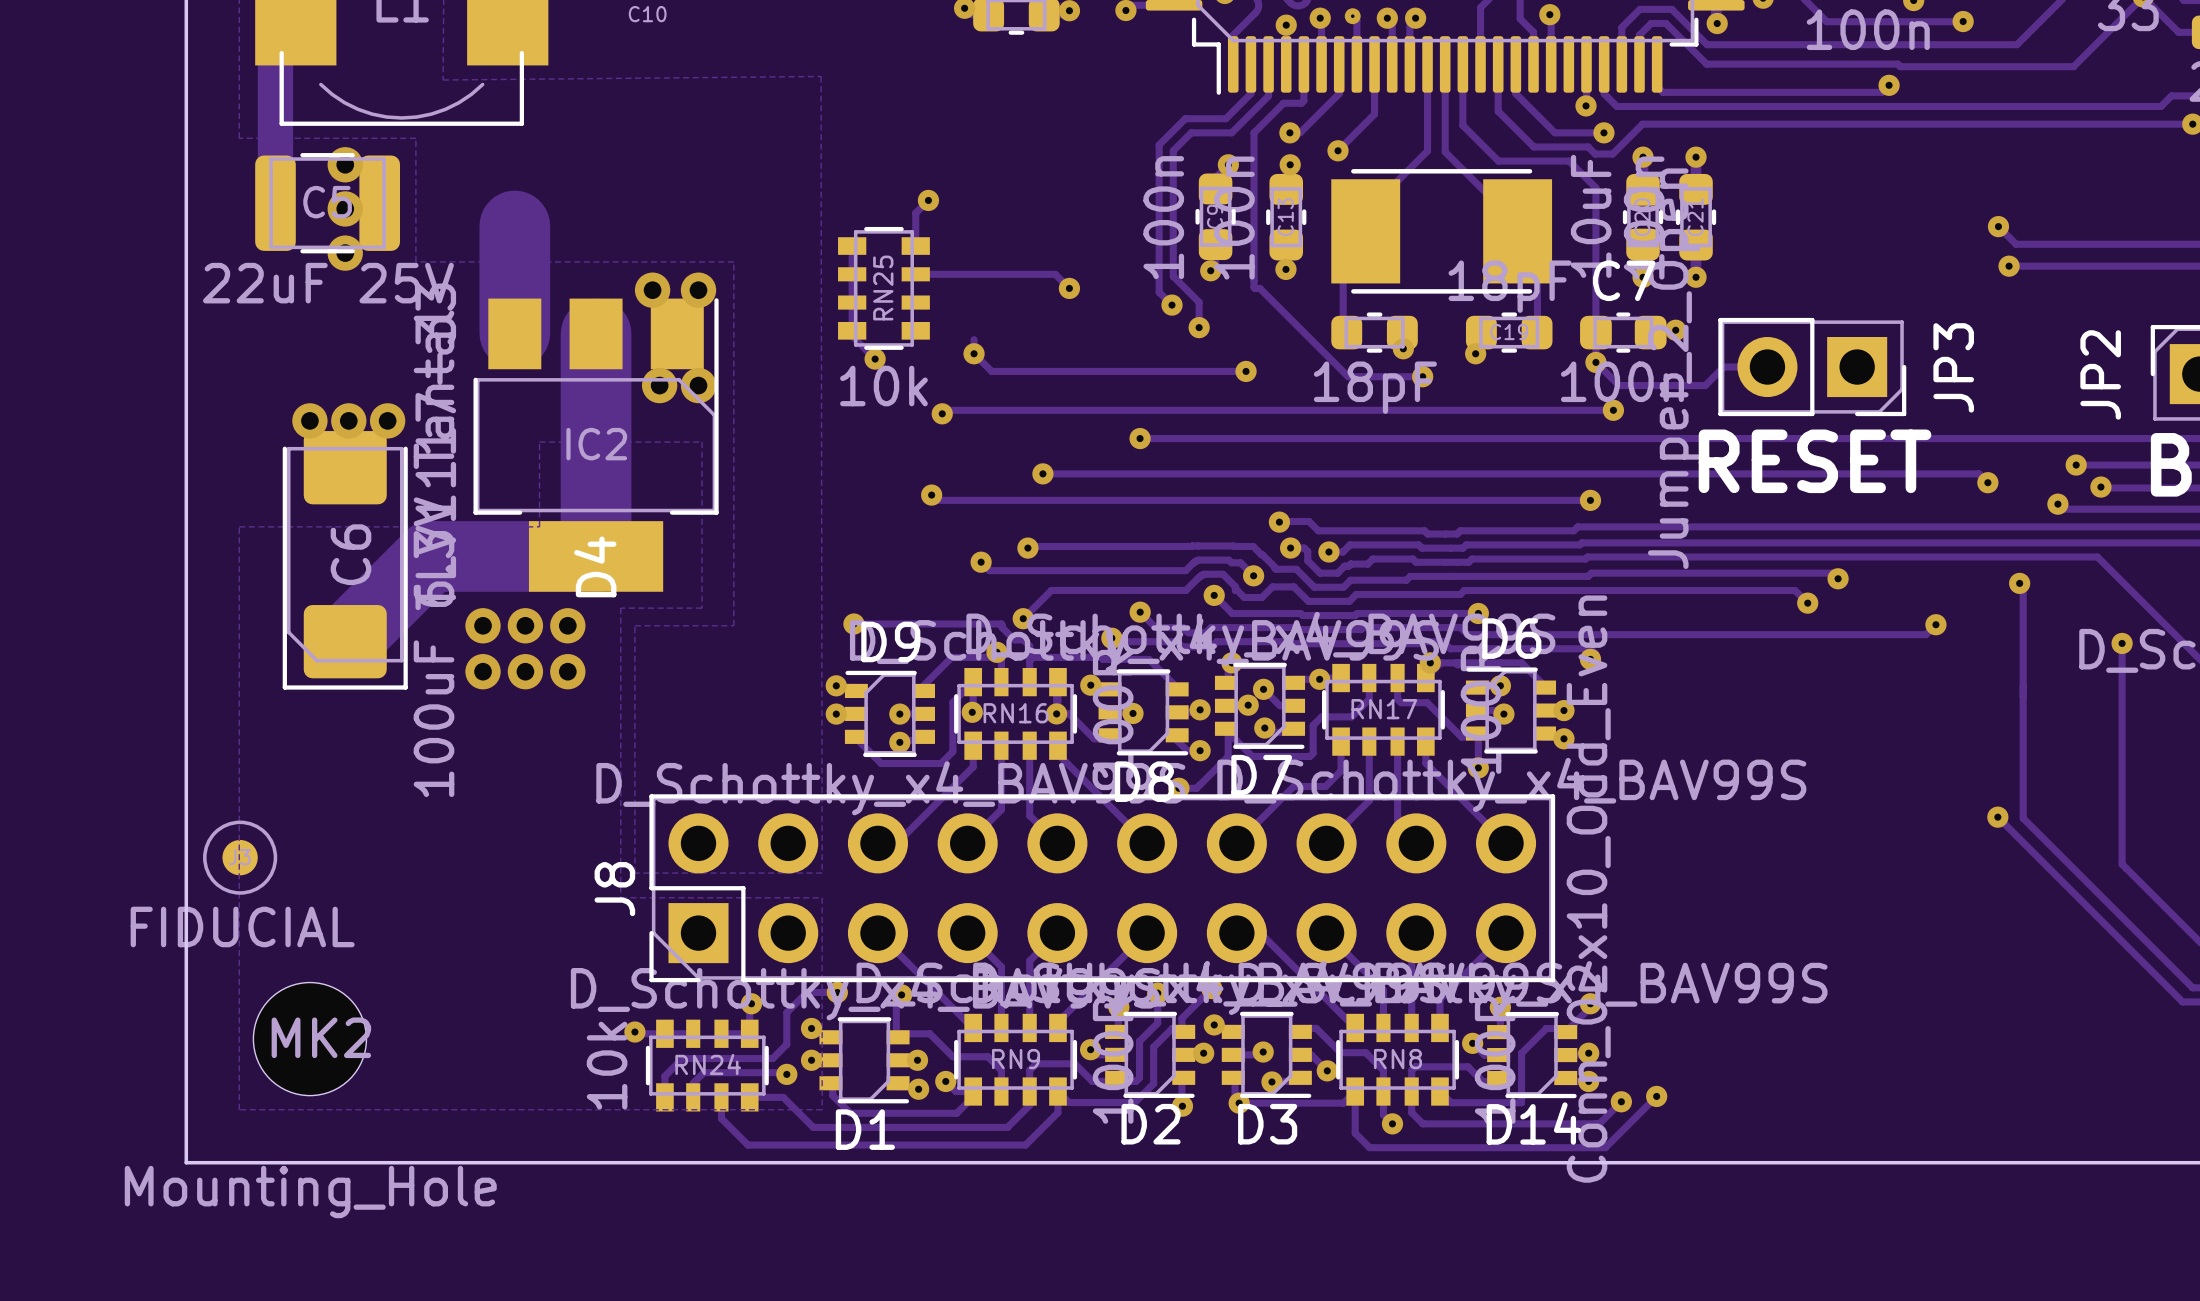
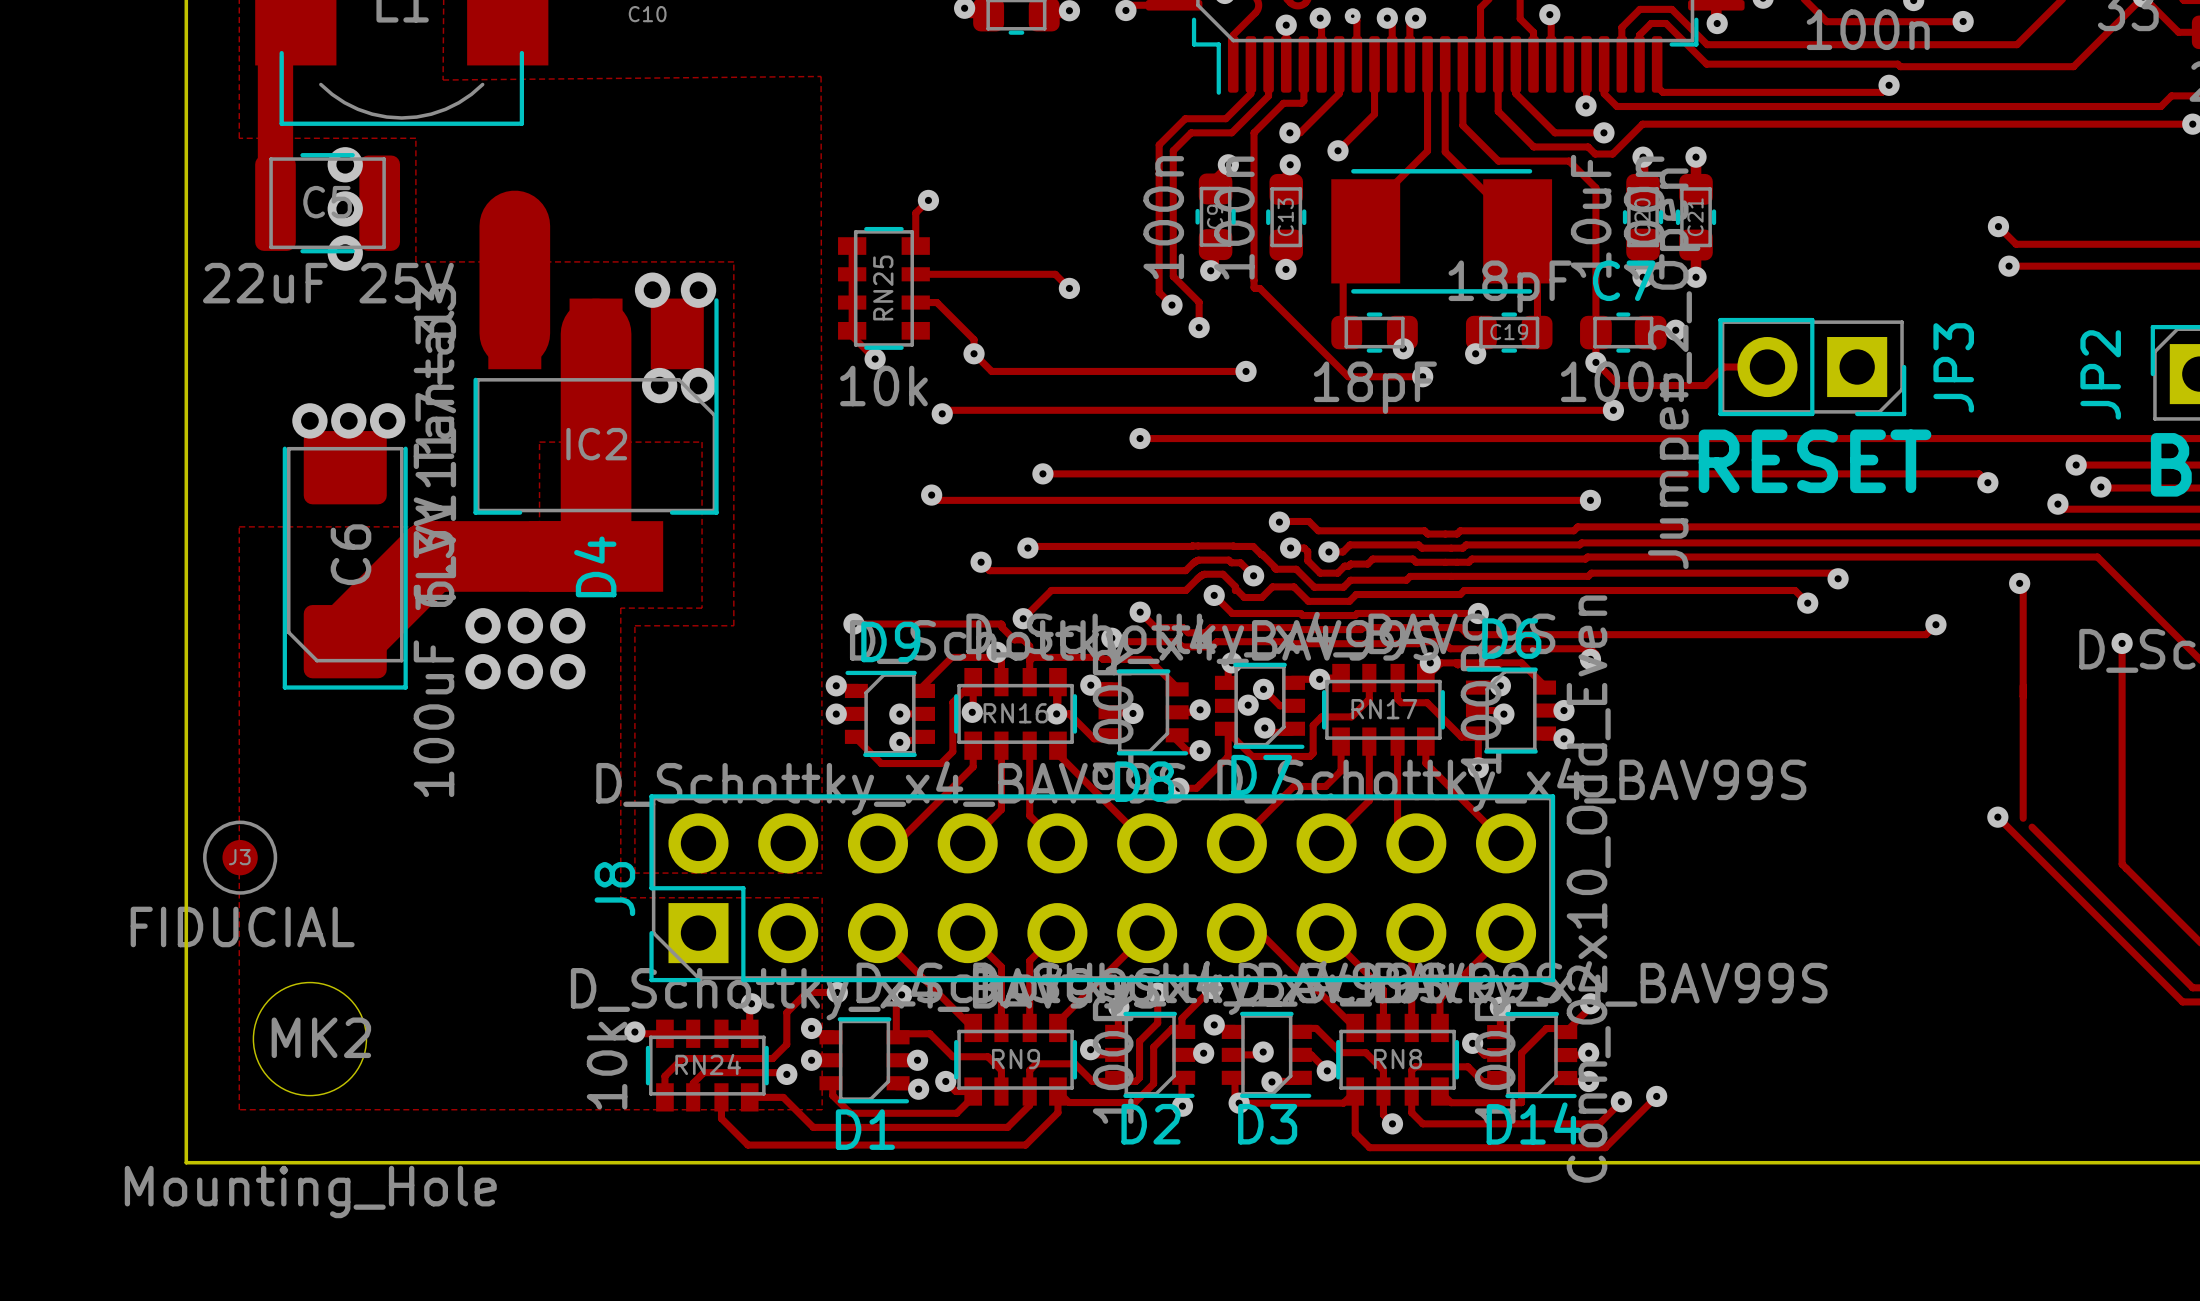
track: none -> (915, 302) (936, 302) (974, 339)
track: (2023, 818) (2032, 827) -> none

